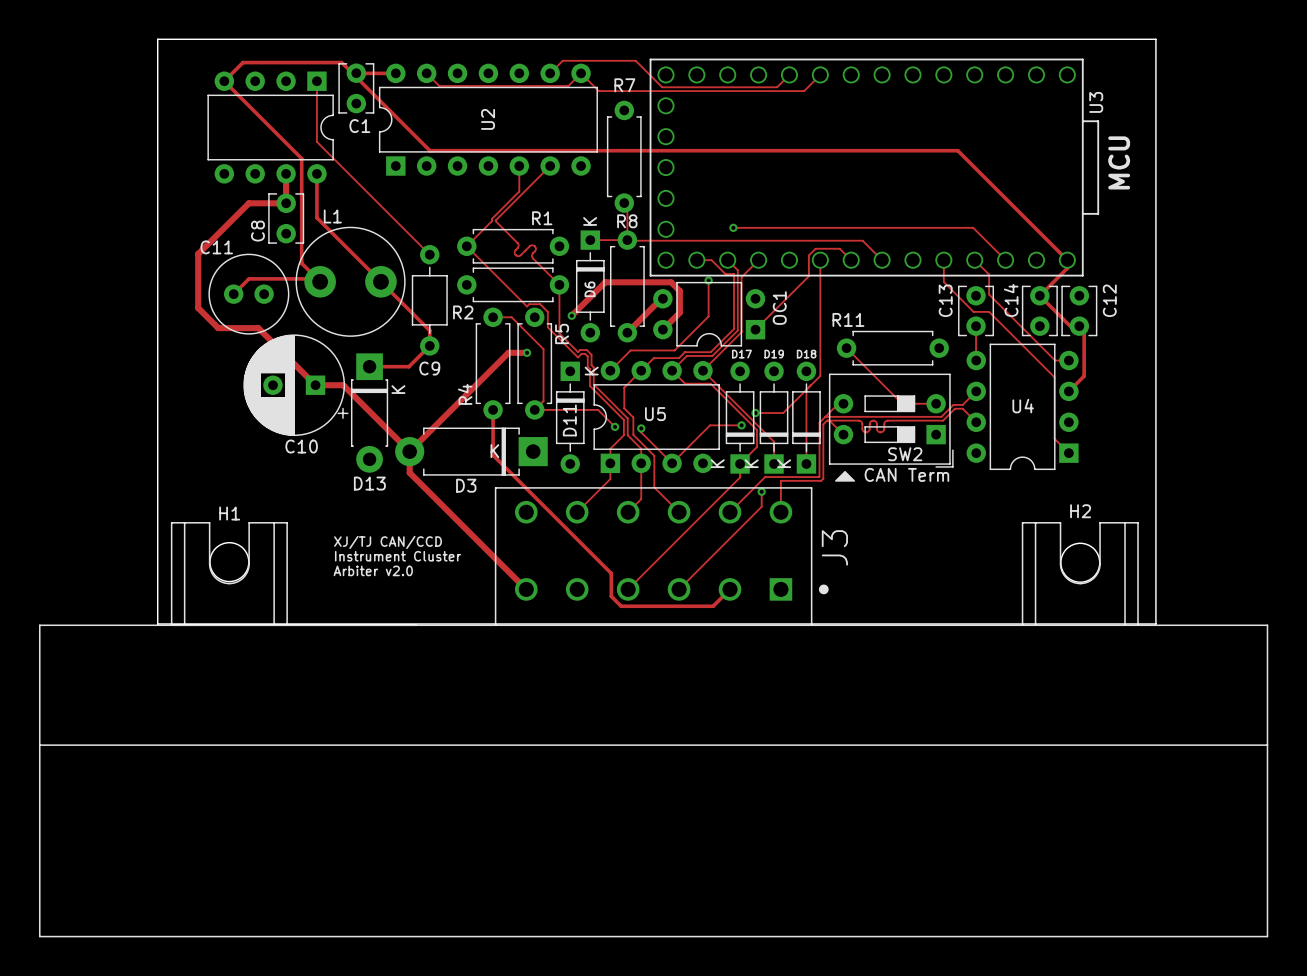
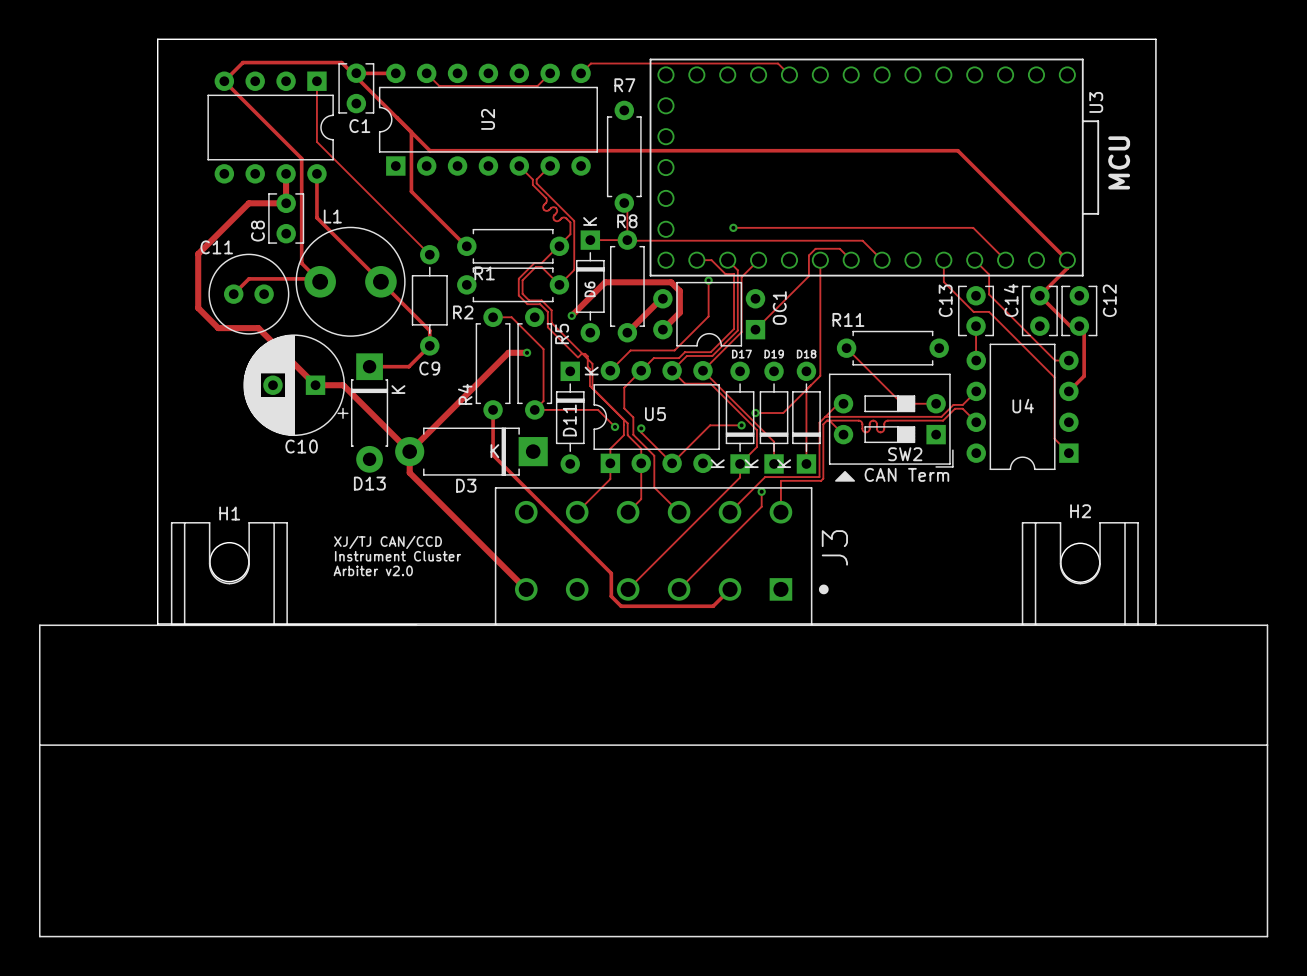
track: (550, 73) (562, 60) (635, 60) (662, 87) (777, 87) (789, 74) -> (581, 73) (590, 63) (778, 63) (789, 74)
track: (820, 74) (804, 91) (598, 91) (581, 73) (568, 85) (537, 85) -> (547, 76) (537, 85)
track: none -> (411, 132) (411, 191) (465, 246)
track: (519, 166) (519, 191) (466, 246) (527, 306) (529, 304) -> (519, 166) (532, 179) (532, 184) (546, 198) (543, 206) (544, 209) (547, 210) (555, 207) (557, 210) (553, 216) (554, 220) (557, 221) (564, 217) (570, 222) (570, 234) (541, 263) (534, 263) (518, 278) (518, 295) (529, 304)
track: (536, 179) (495, 221) (518, 243) (518, 246) (514, 251) (515, 255) (519, 255) (530, 246) (533, 245) (535, 249) (532, 257) (541, 266) -> (536, 179) (536, 183) (574, 220) (574, 270) (559, 284)
R1 name position: R1 (542, 218) -> R1 (484, 273)
track: (559, 284) (559, 333) (577, 351) (586, 350) (591, 354) (593, 384) (627, 418) (627, 423) -> (541, 266) (535, 266) (522, 280) (522, 293) (529, 300) (541, 300) (551, 310) (551, 322) (592, 363) (592, 388) (627, 423)

